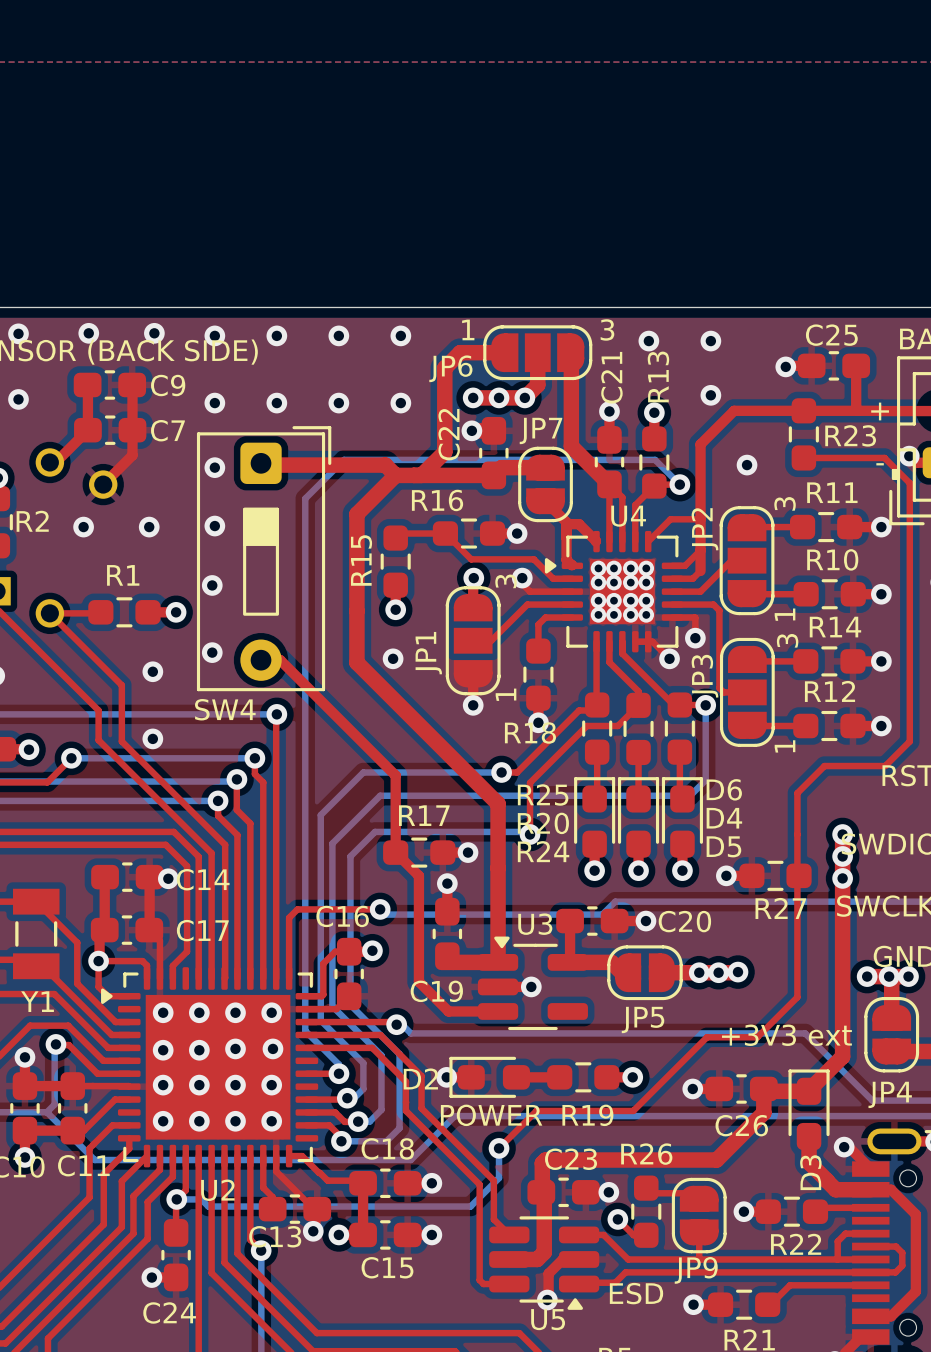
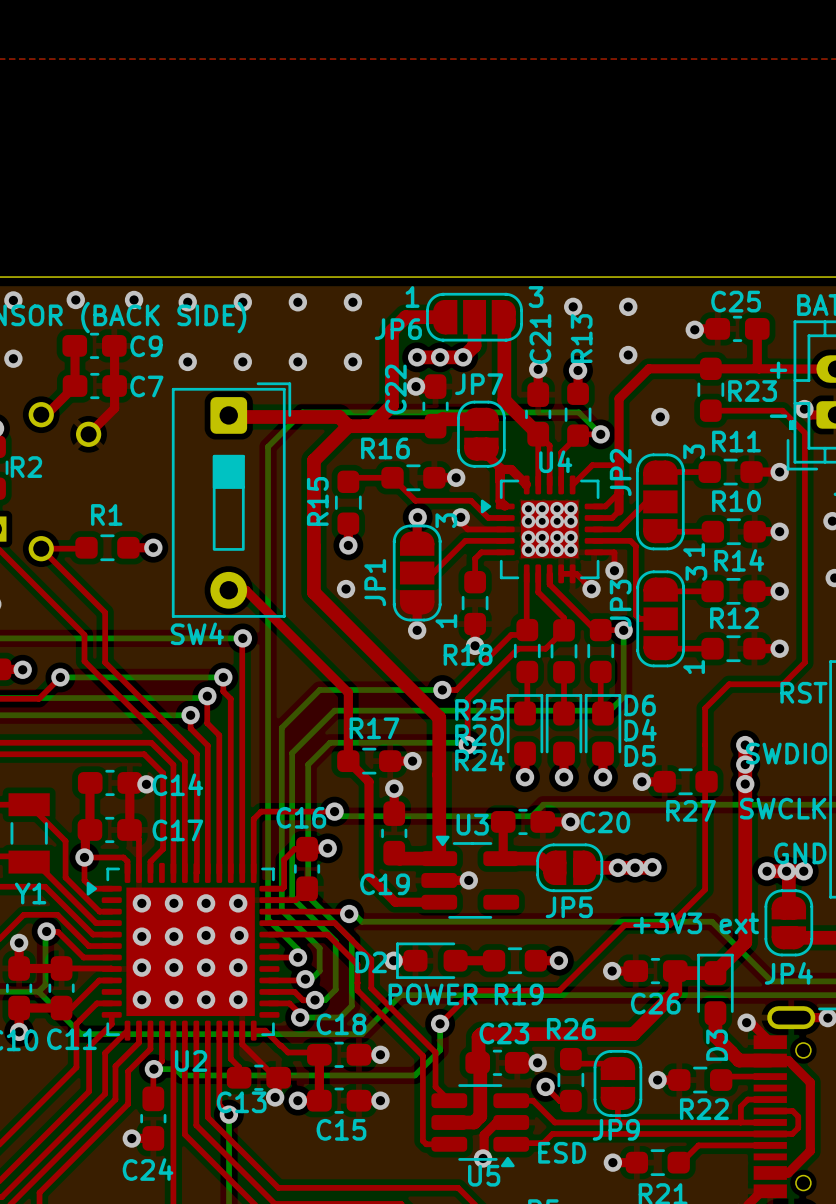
via: (214, 467) -> none
via: (214, 526) -> none
via: (83, 527) -> none
via: (149, 527) -> none
via: (212, 585) -> none
via: (212, 652) -> none
via: (152, 671) -> none
via: (152, 738) -> none

